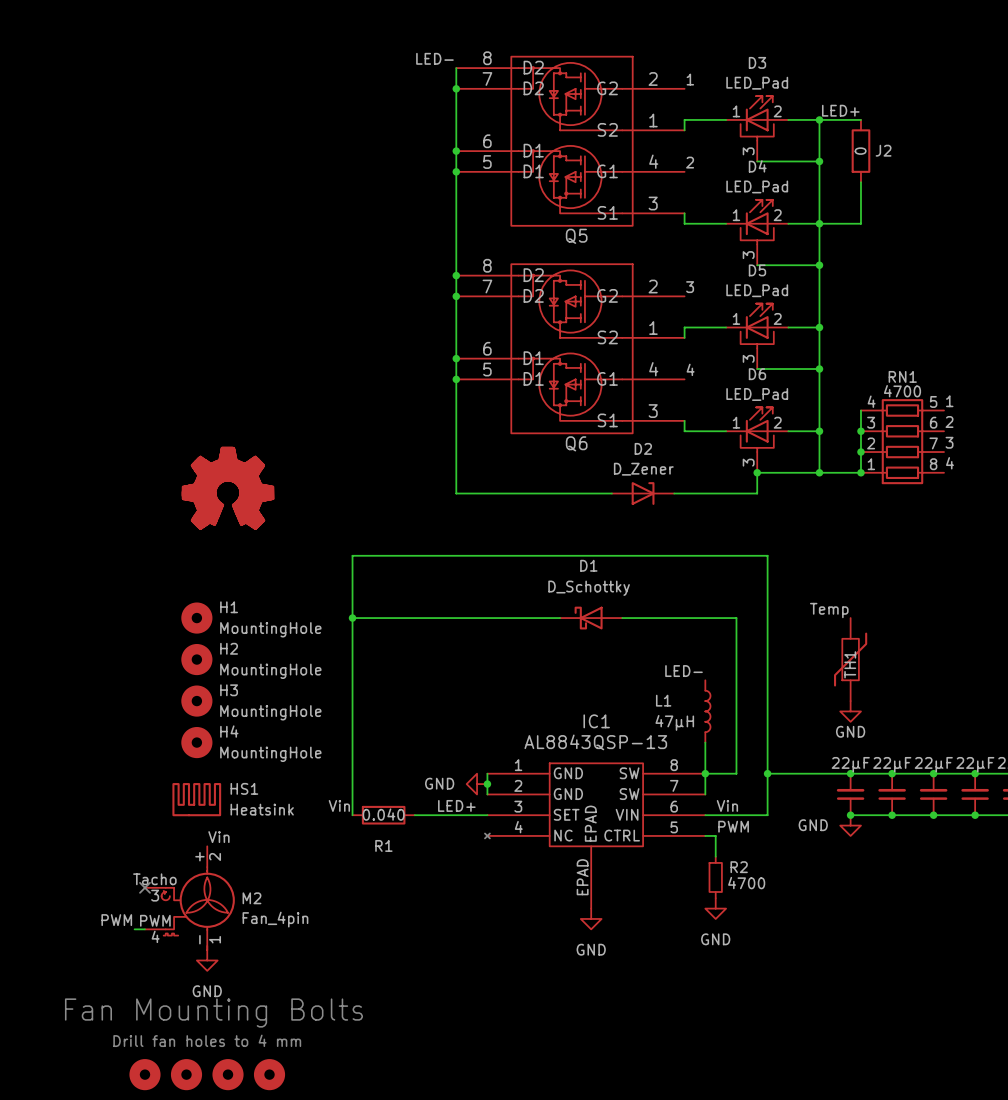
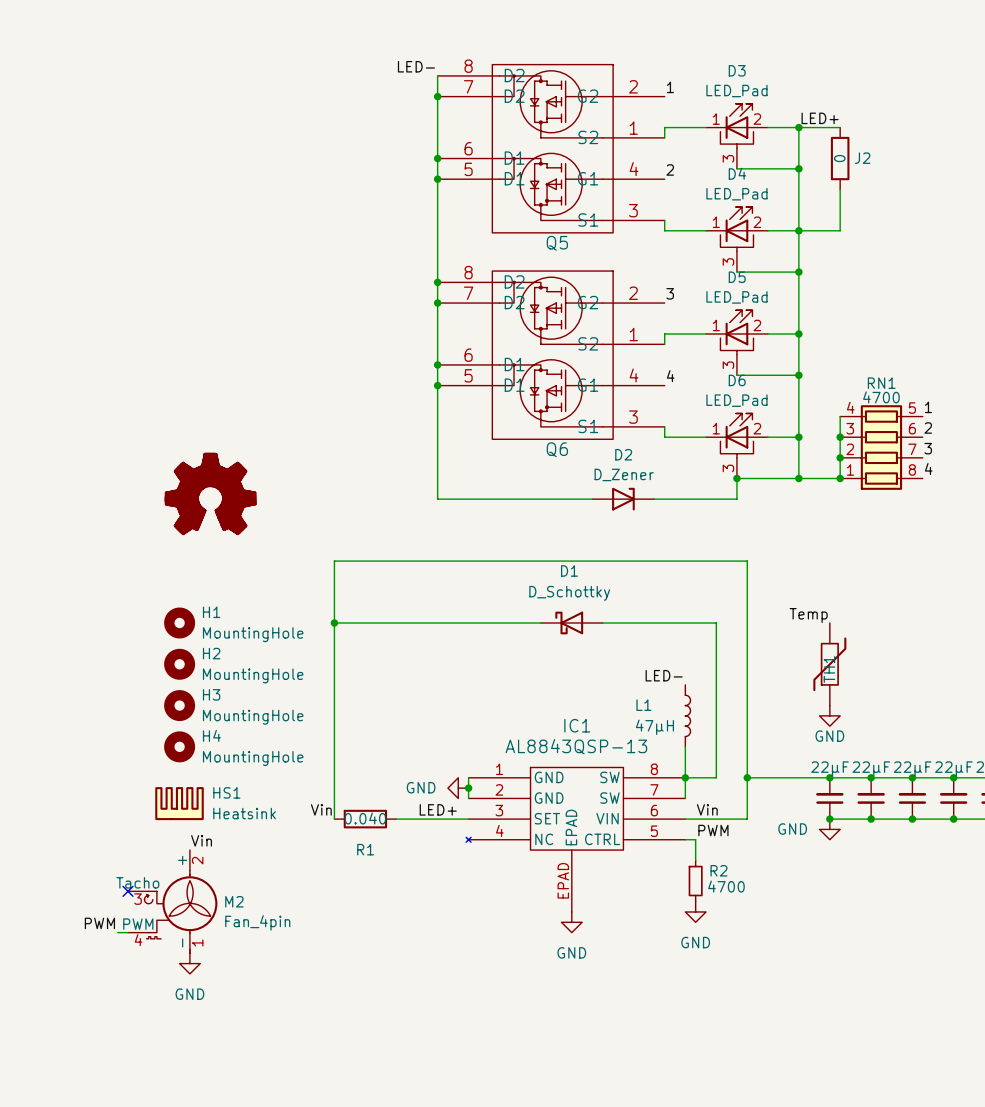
text: Fan Mounting Bolts (213, 1013) -> none
text: Drill fan holes to 4 mm (207, 1040) -> none
part: (144, 1074) -> none
part: (186, 1074) -> none
part: (228, 1074) -> none
part: (269, 1074) -> none

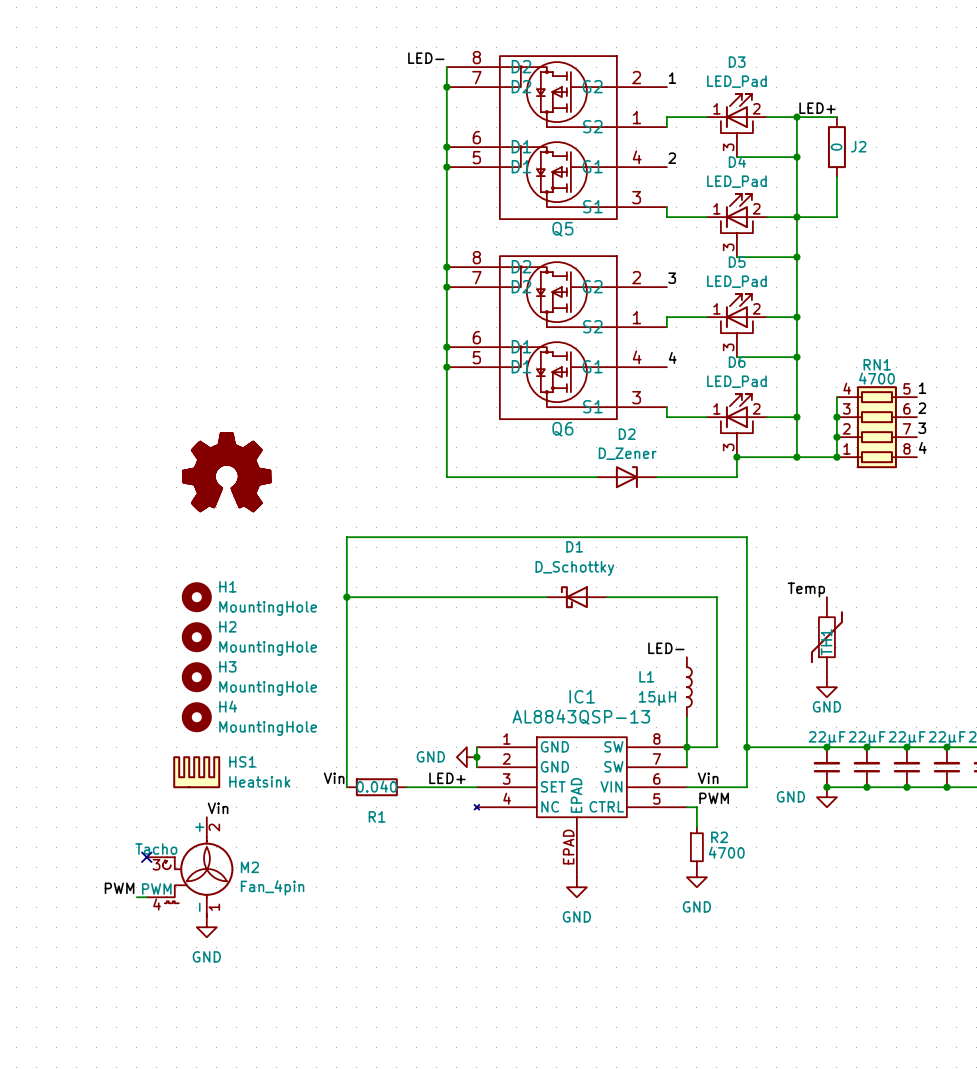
L1 value: 47μH (654, 727) -> 15μH (657, 698)

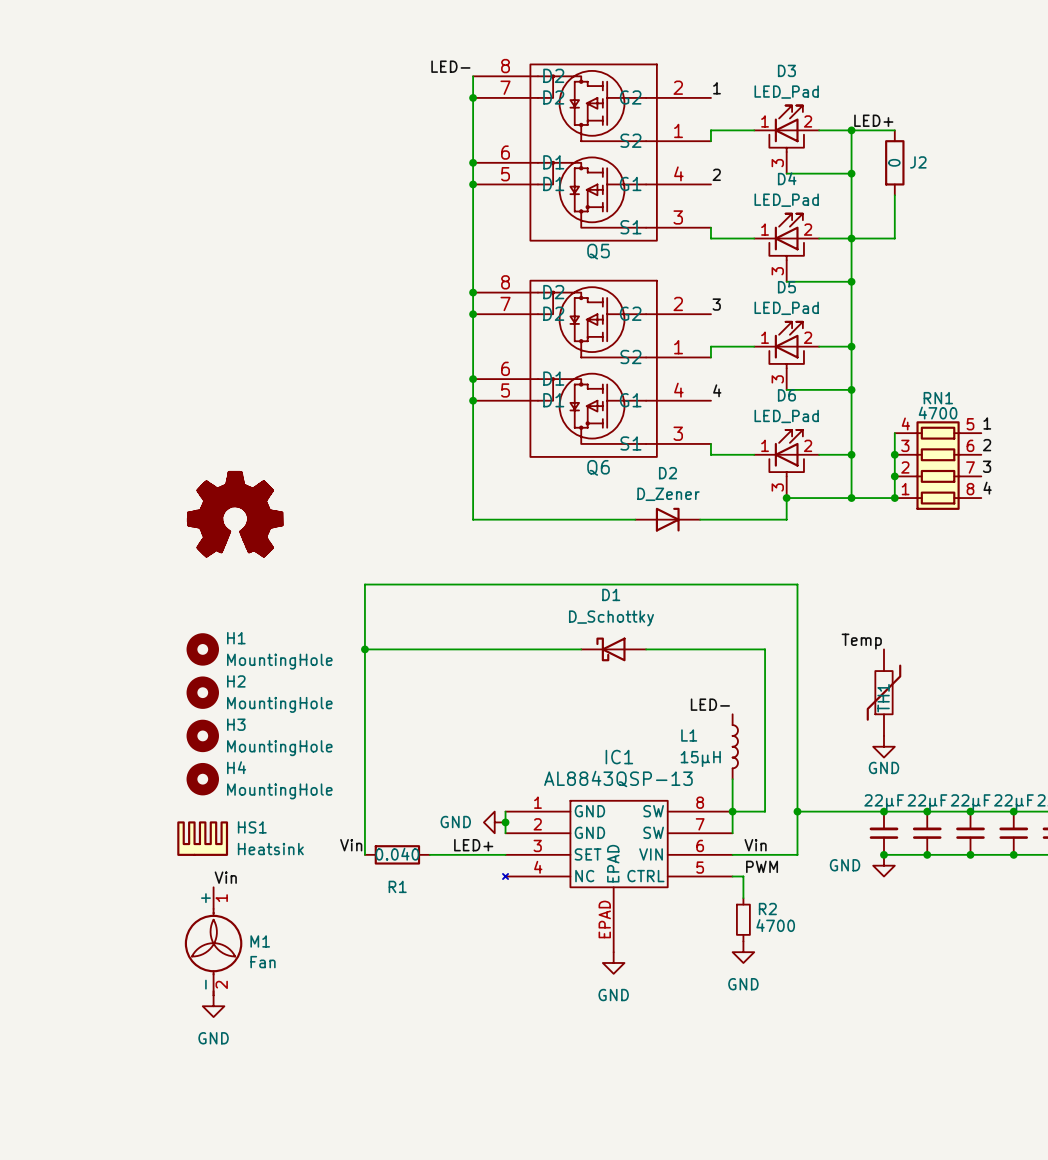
no-connect mark: (146, 857) -> none
M2: Fan_4pin (190, 867) -> none
M1: none -> Fan (213, 941)
label: PWM (119, 888) -> none
wire: (136, 897) (146, 897) -> none

